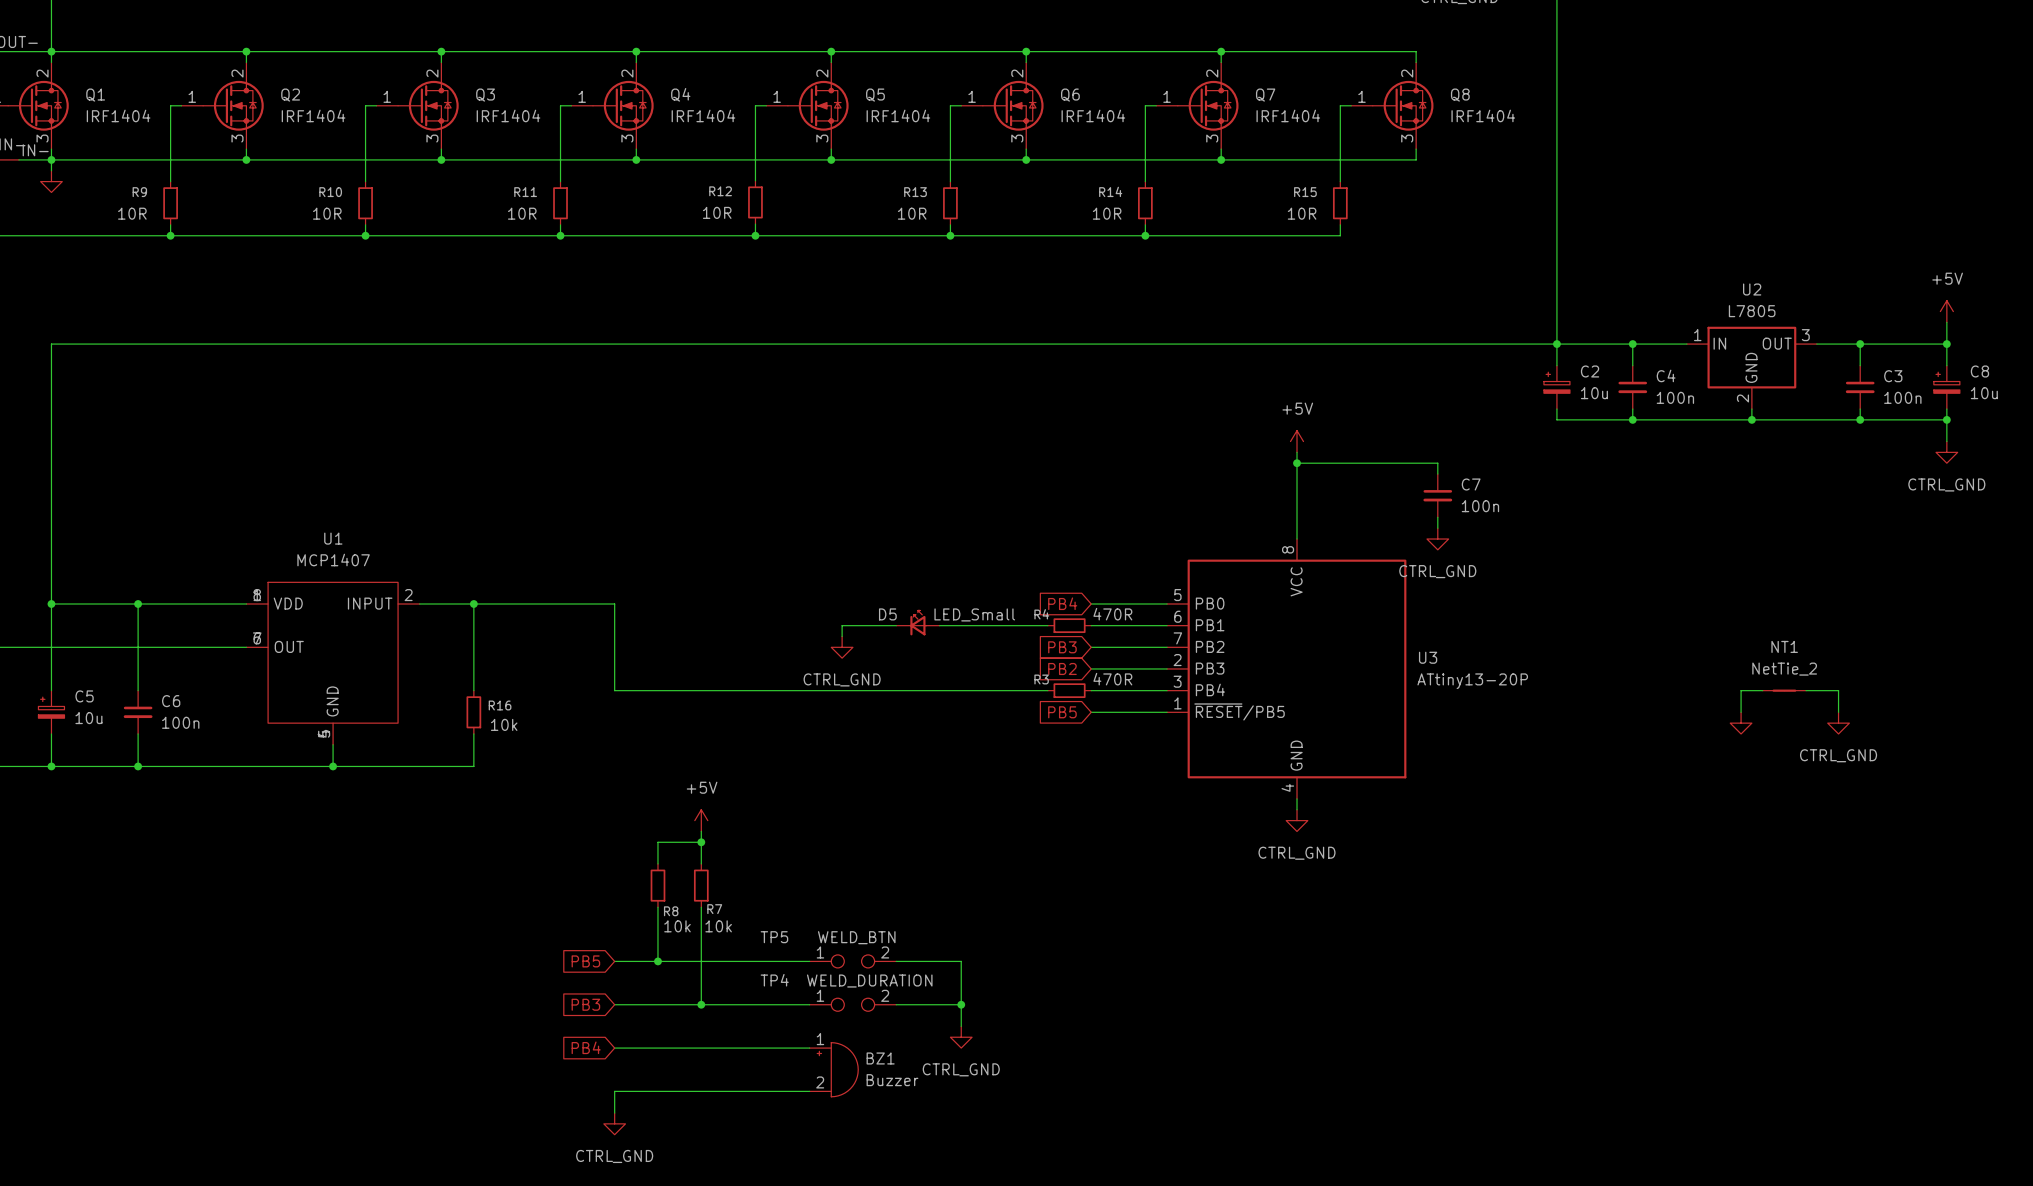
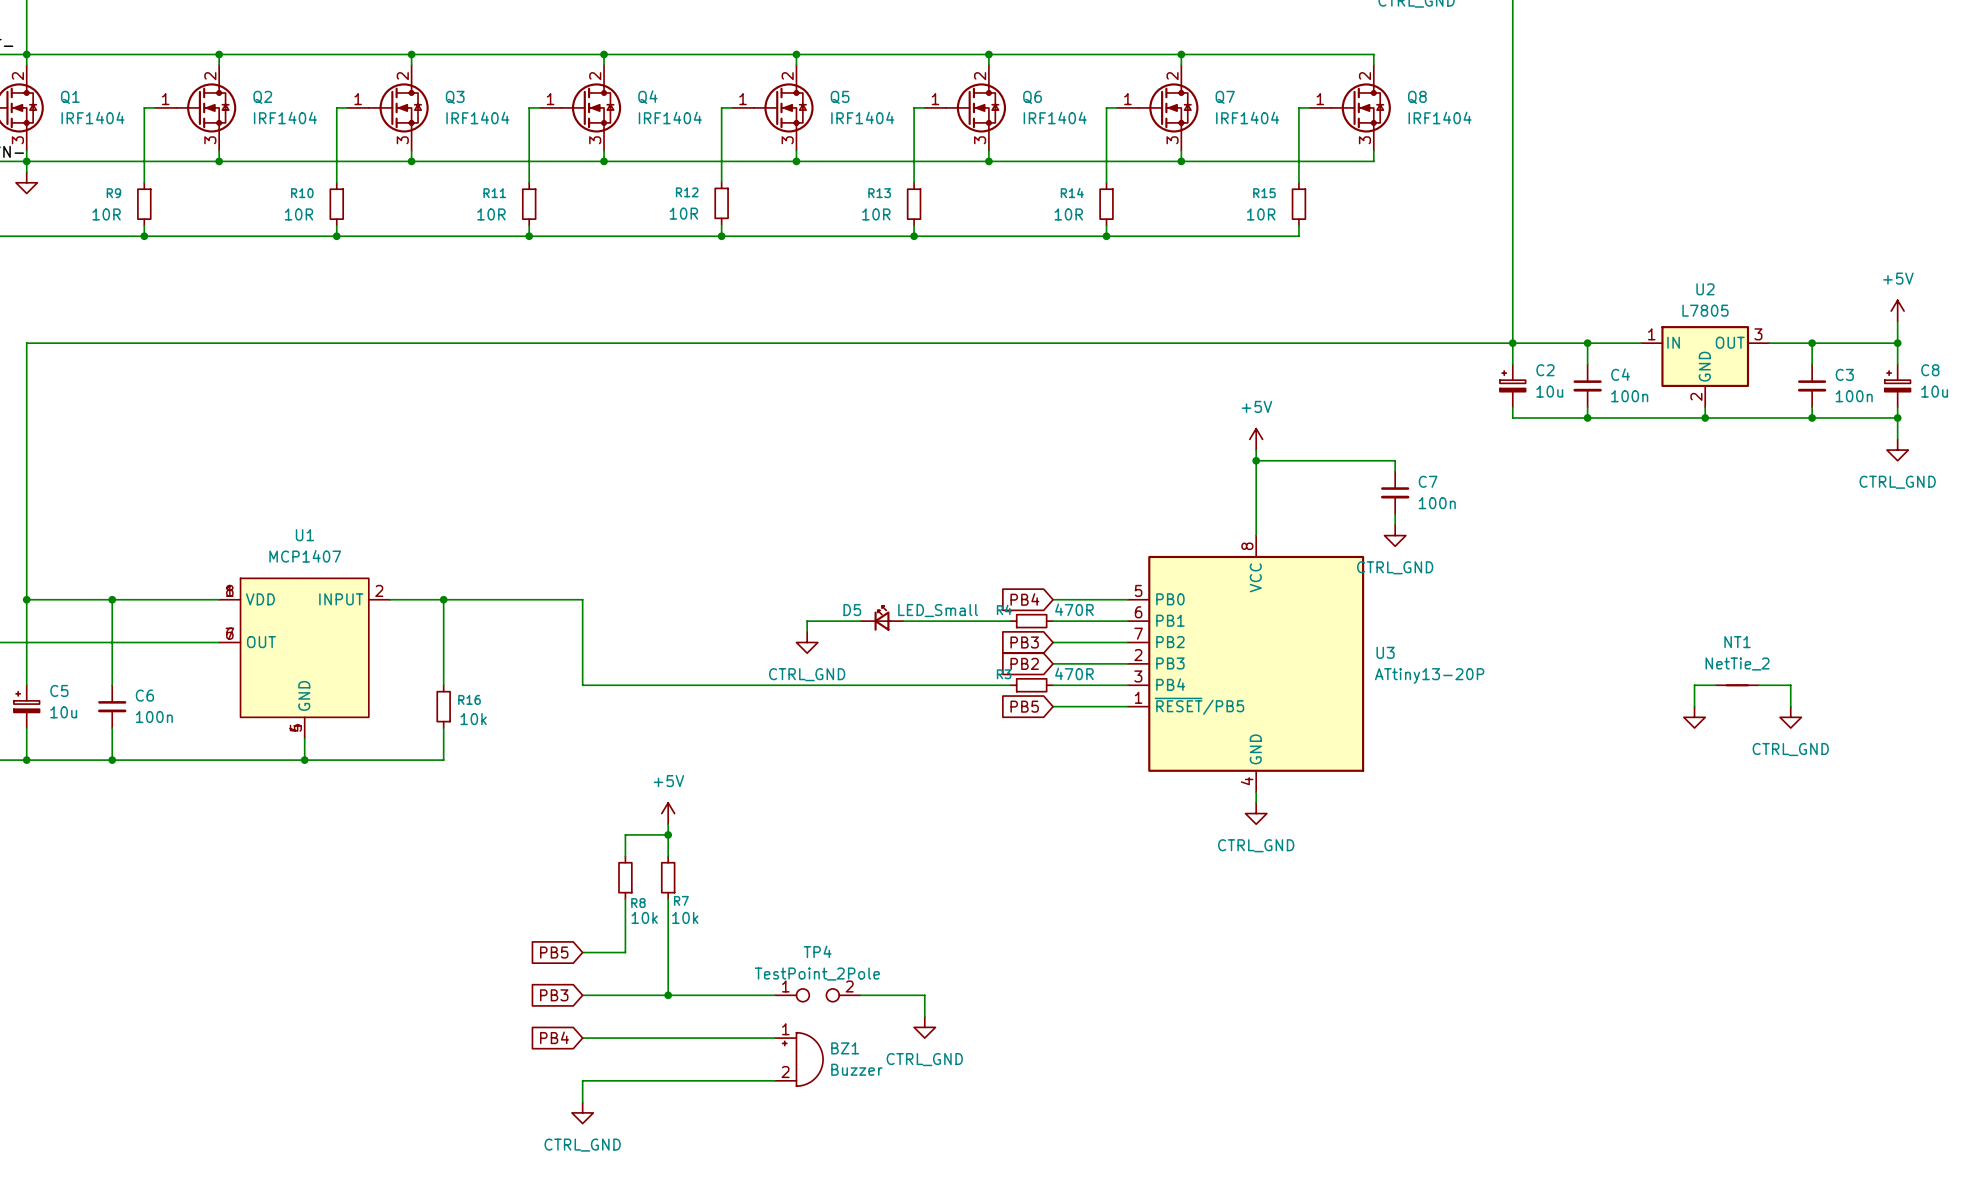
wire: (657, 961) (809, 961) -> none
junction: (657, 961) -> none
TP5: WELD_BTN (852, 961) -> none
wire: (896, 961) (961, 961) (961, 1004) -> none
TP4 name position: TP4 (774, 980) -> TP4 (817, 951)
TP4 value: WELD_DURATION (869, 981) -> TestPoint_2Pole (817, 974)
junction: (961, 1004) -> none

